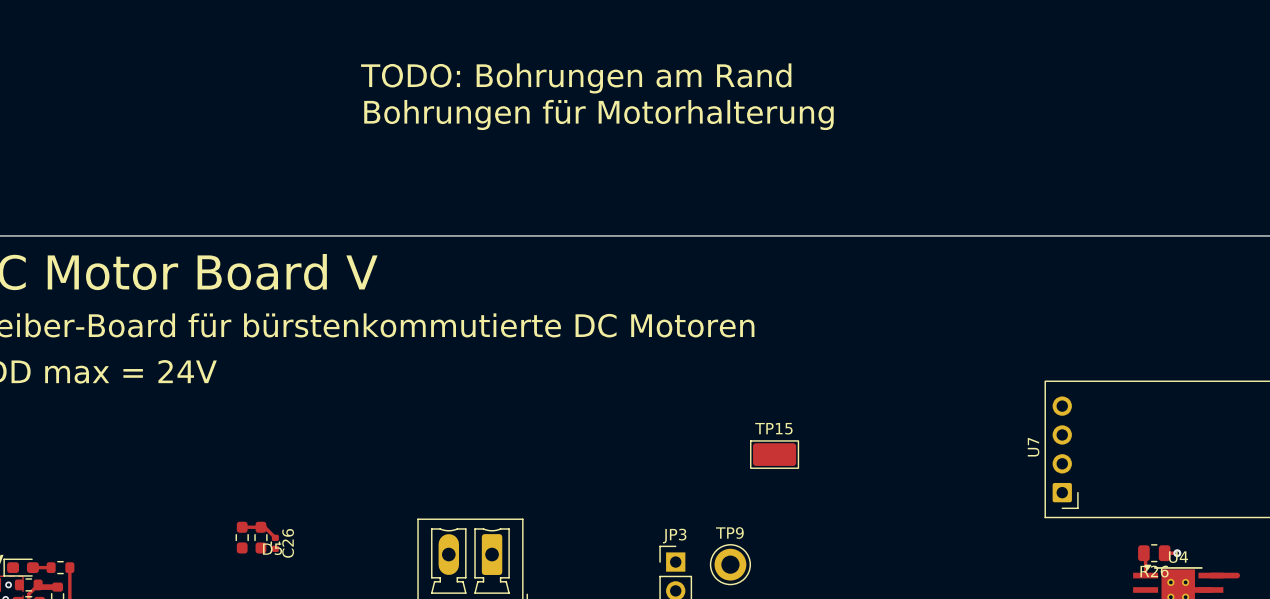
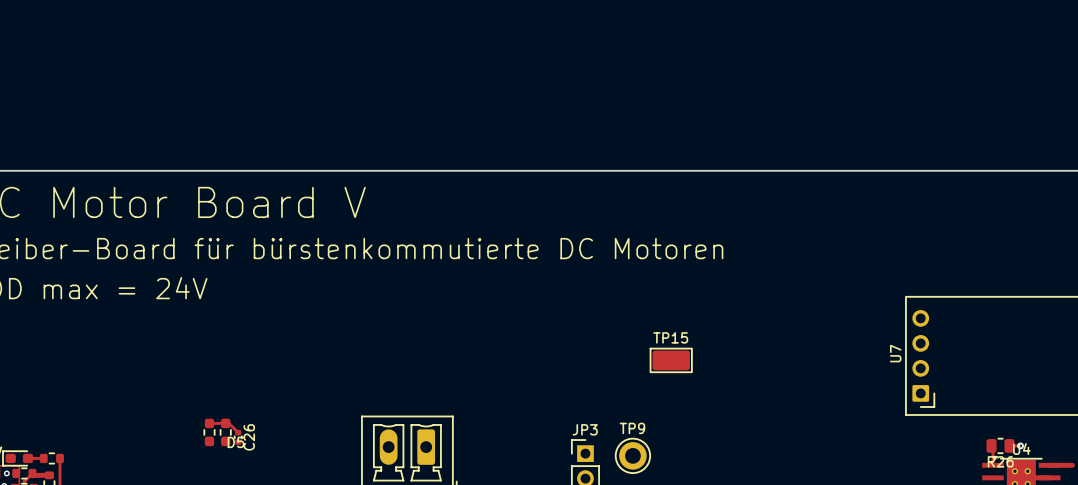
text: TODO: Bohrungen am Rand (576, 78) -> none
text: Bohrungen für Motorhalterung (598, 115) -> none

